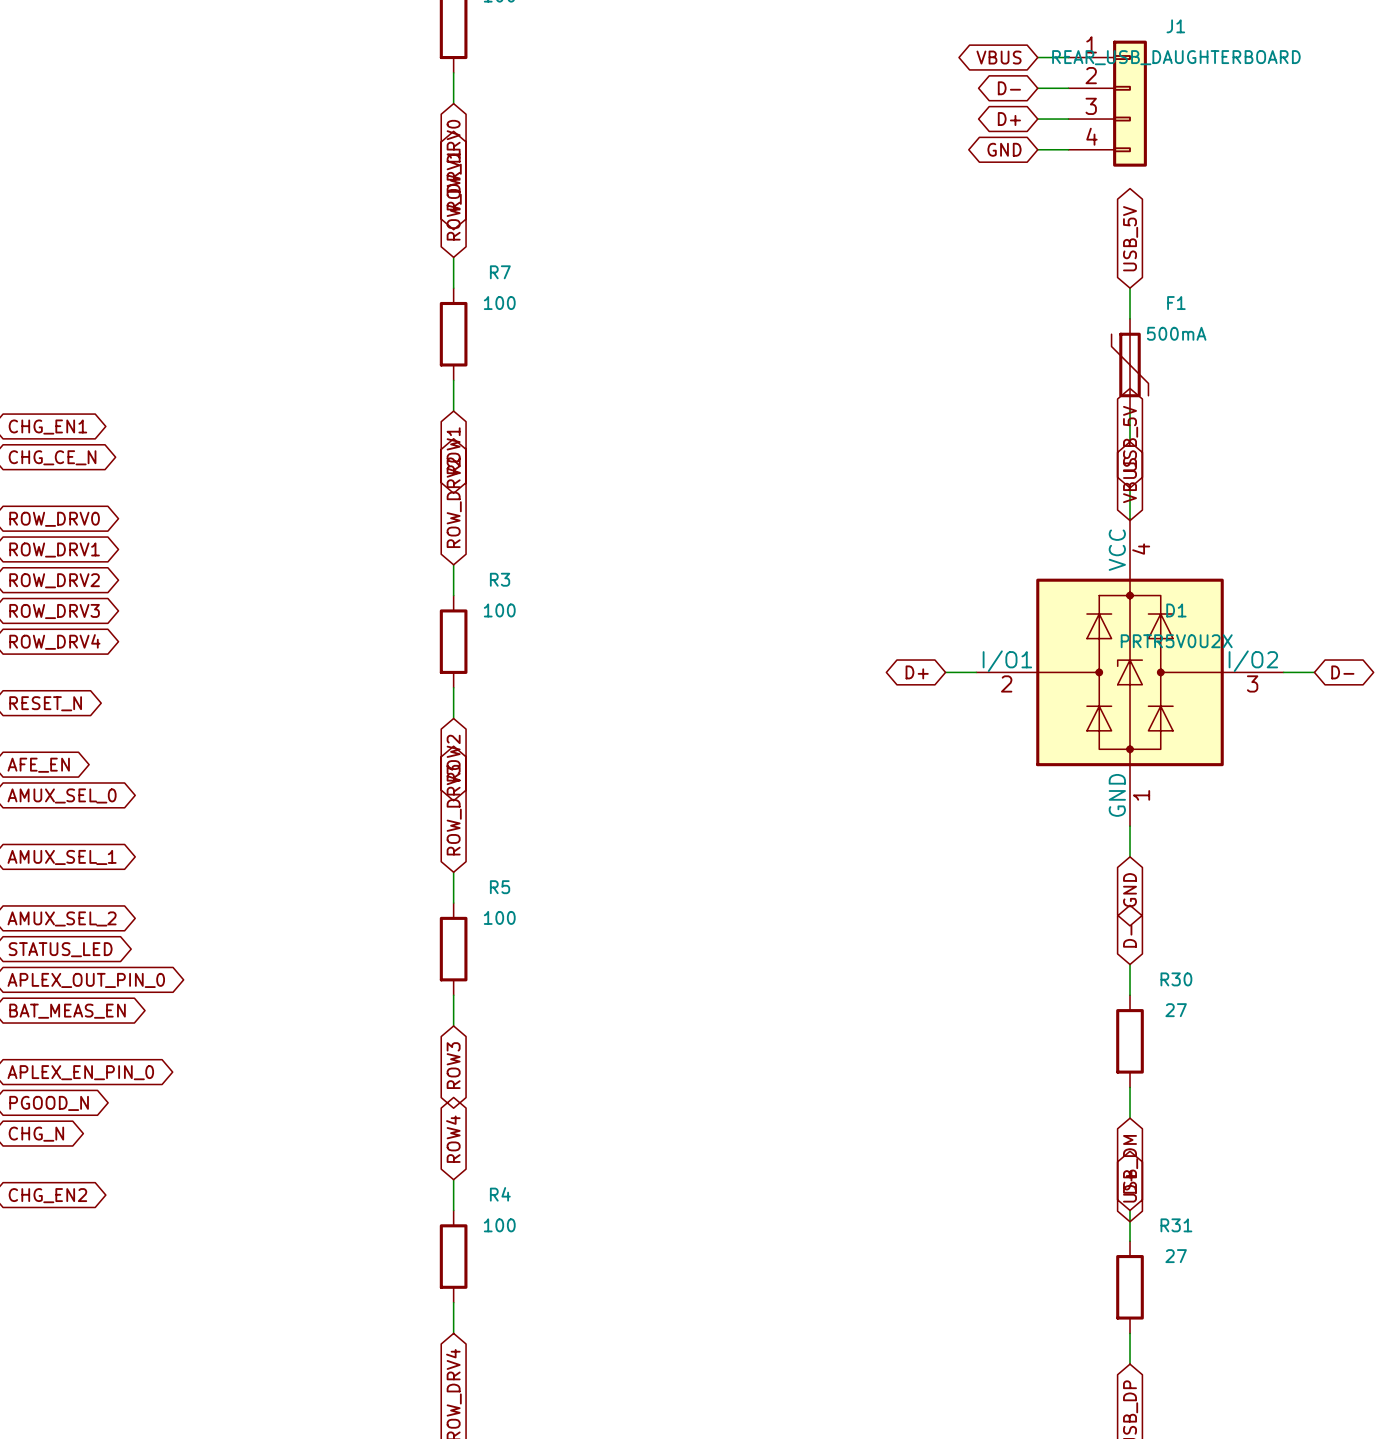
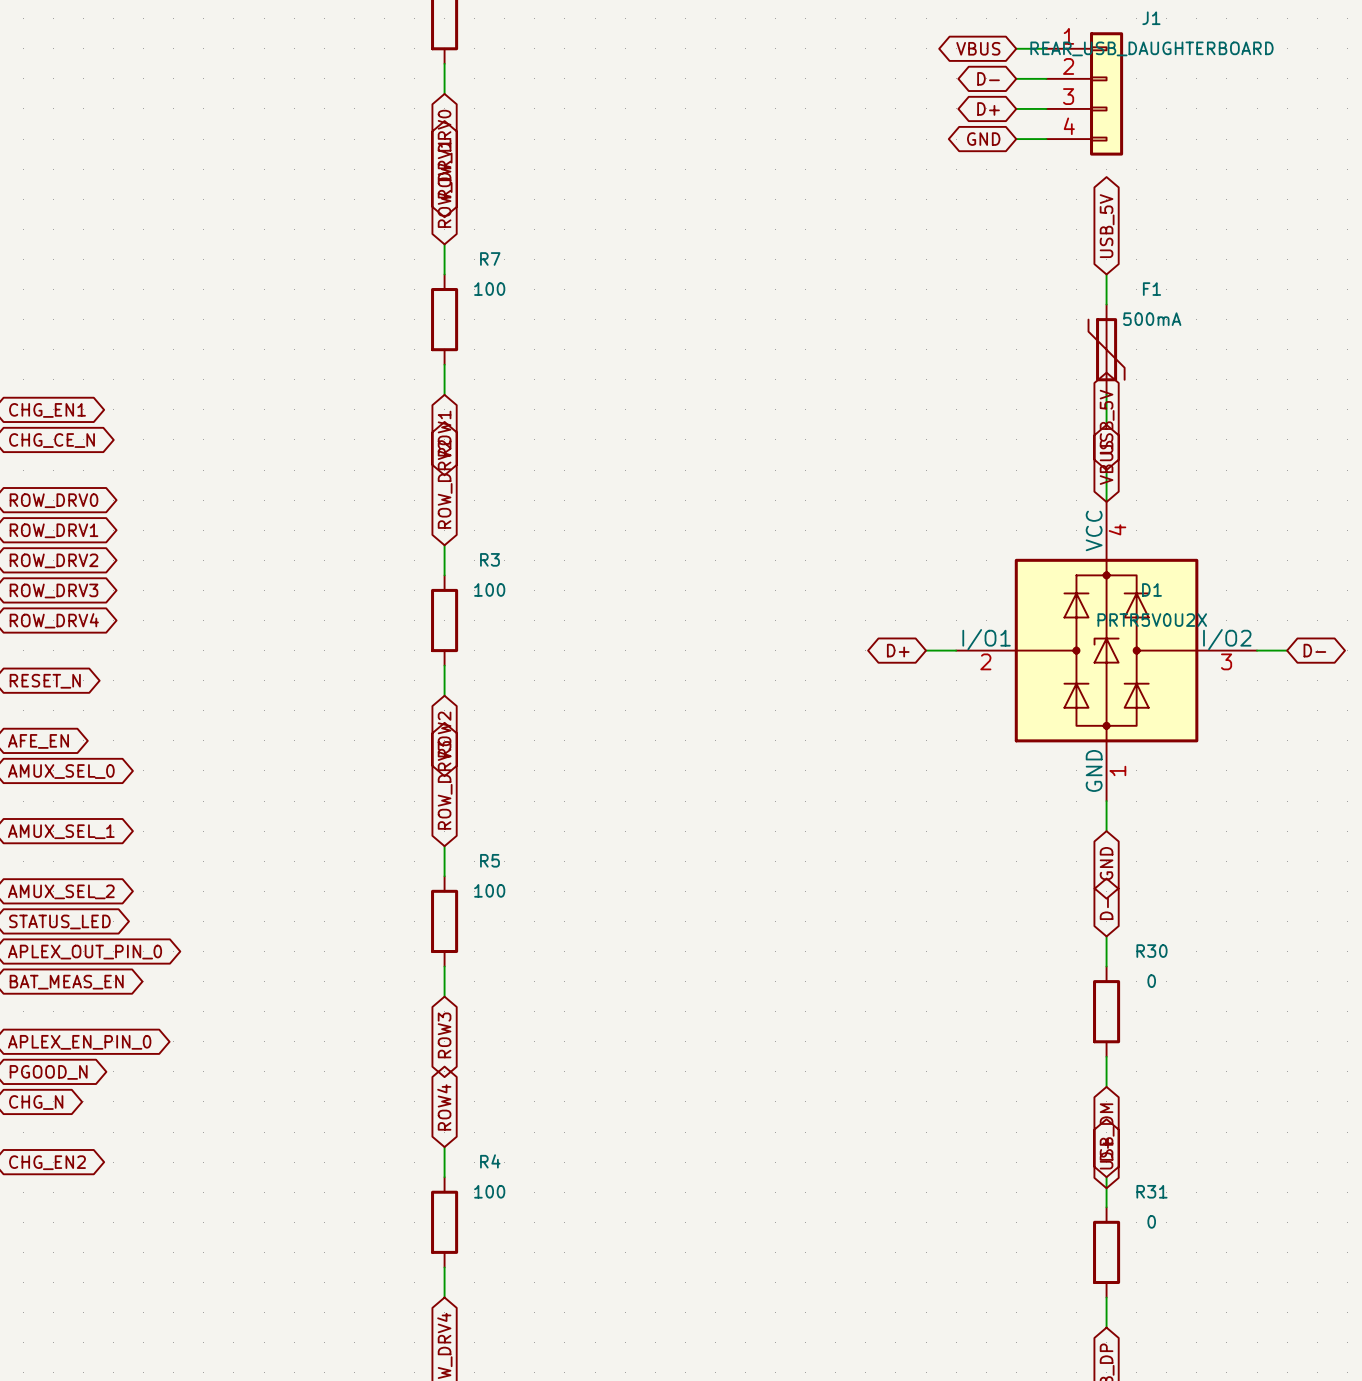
R30 value: 27 (1176, 1010) -> 0 (1151, 981)
R31 value: 27 (1176, 1256) -> 0 (1151, 1221)

